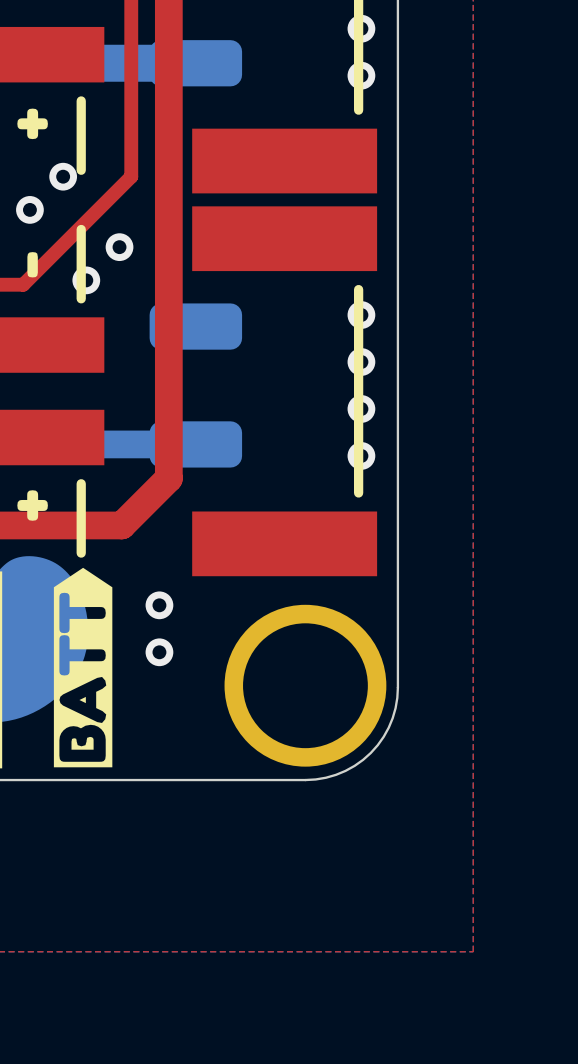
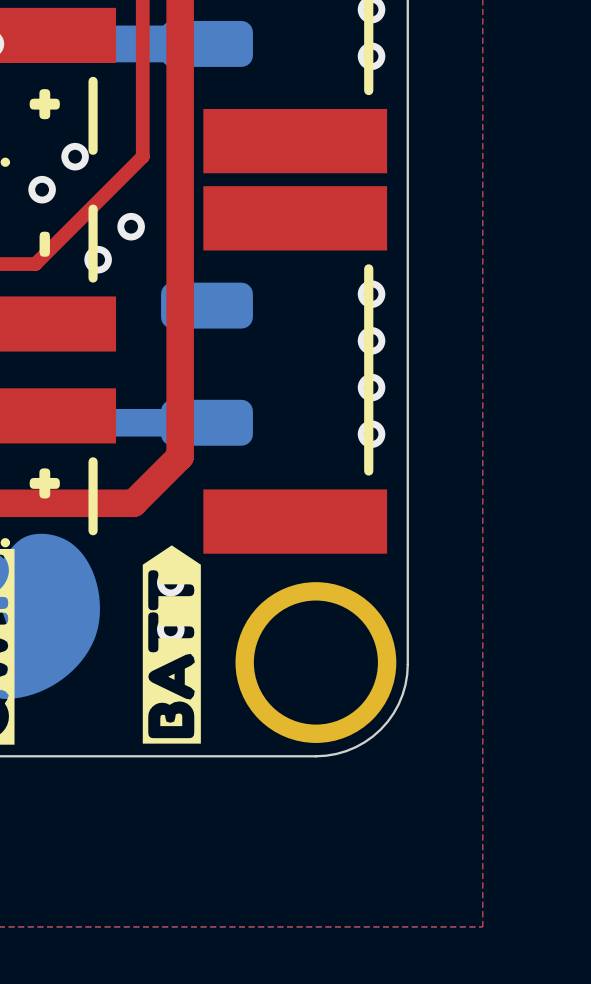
drawing position: (83, 667) -> (171, 644)

